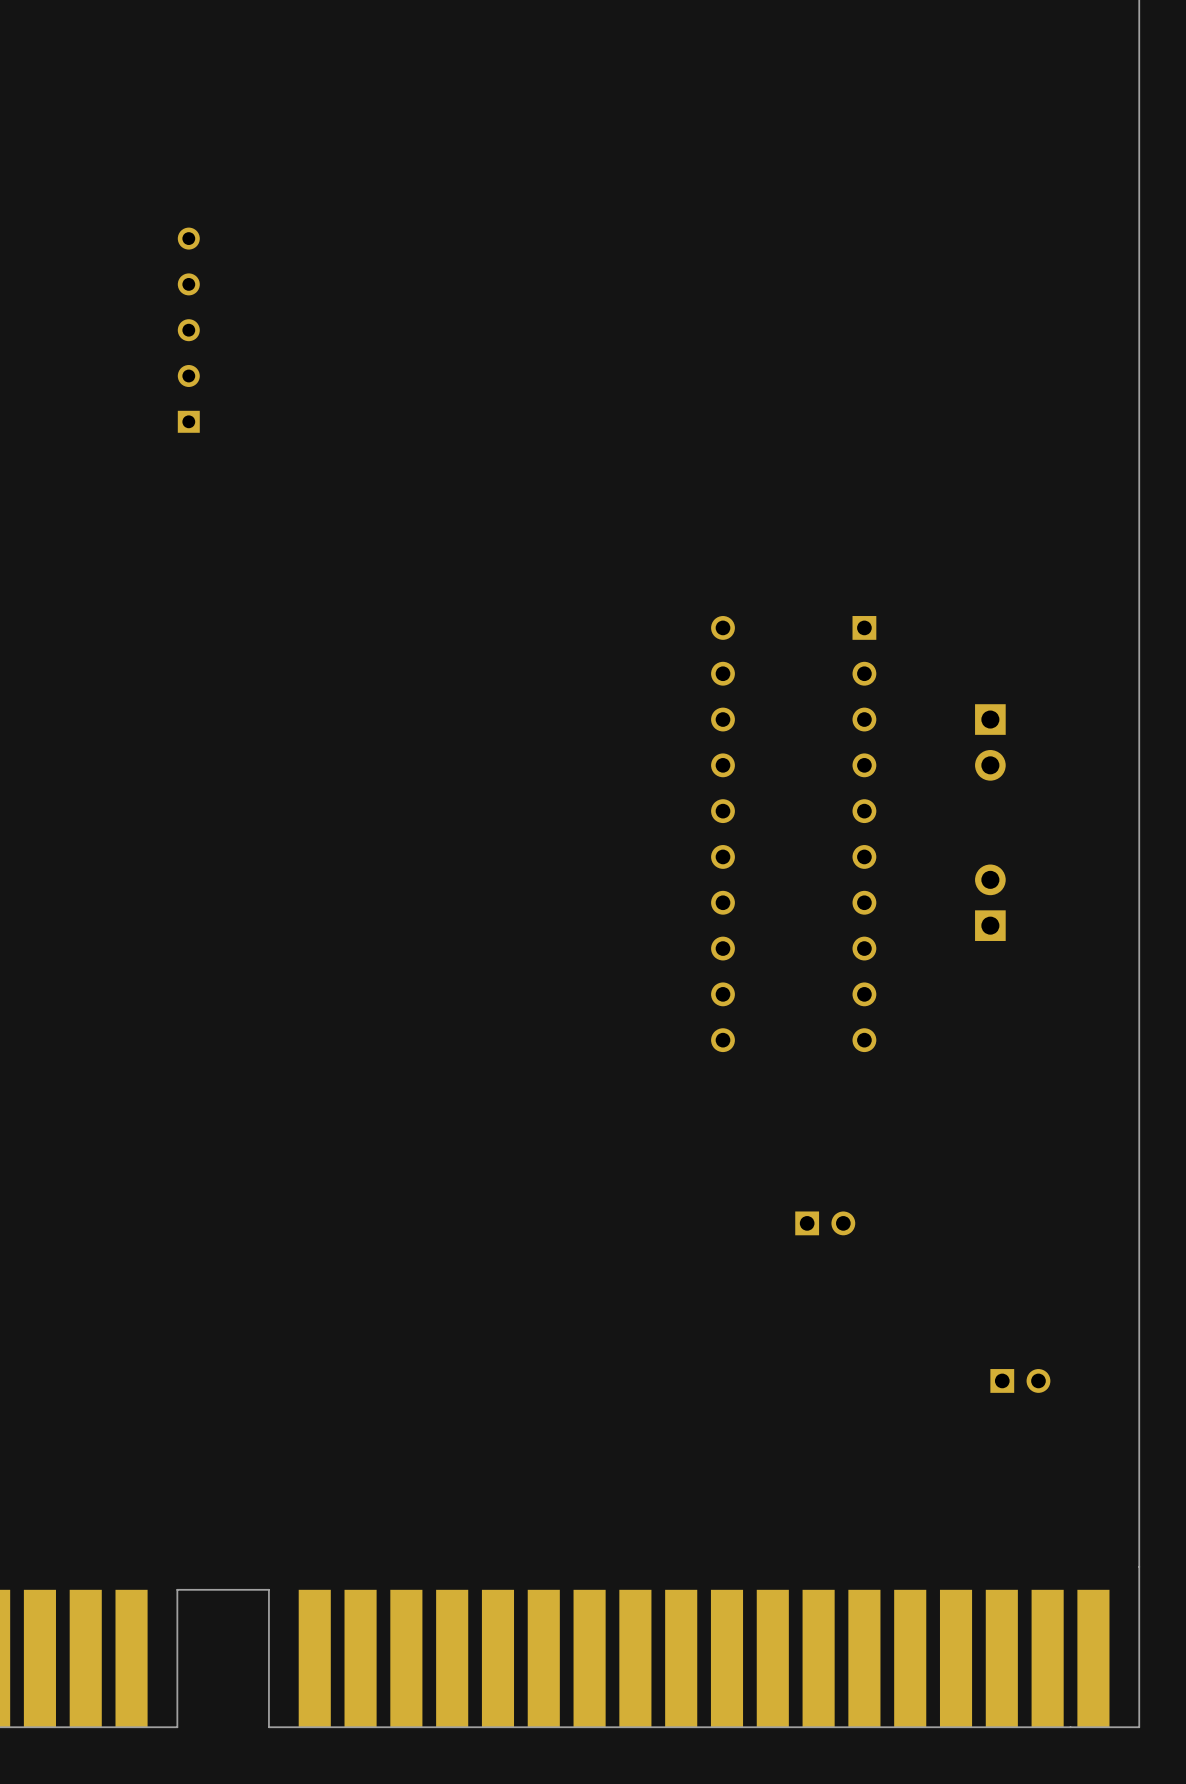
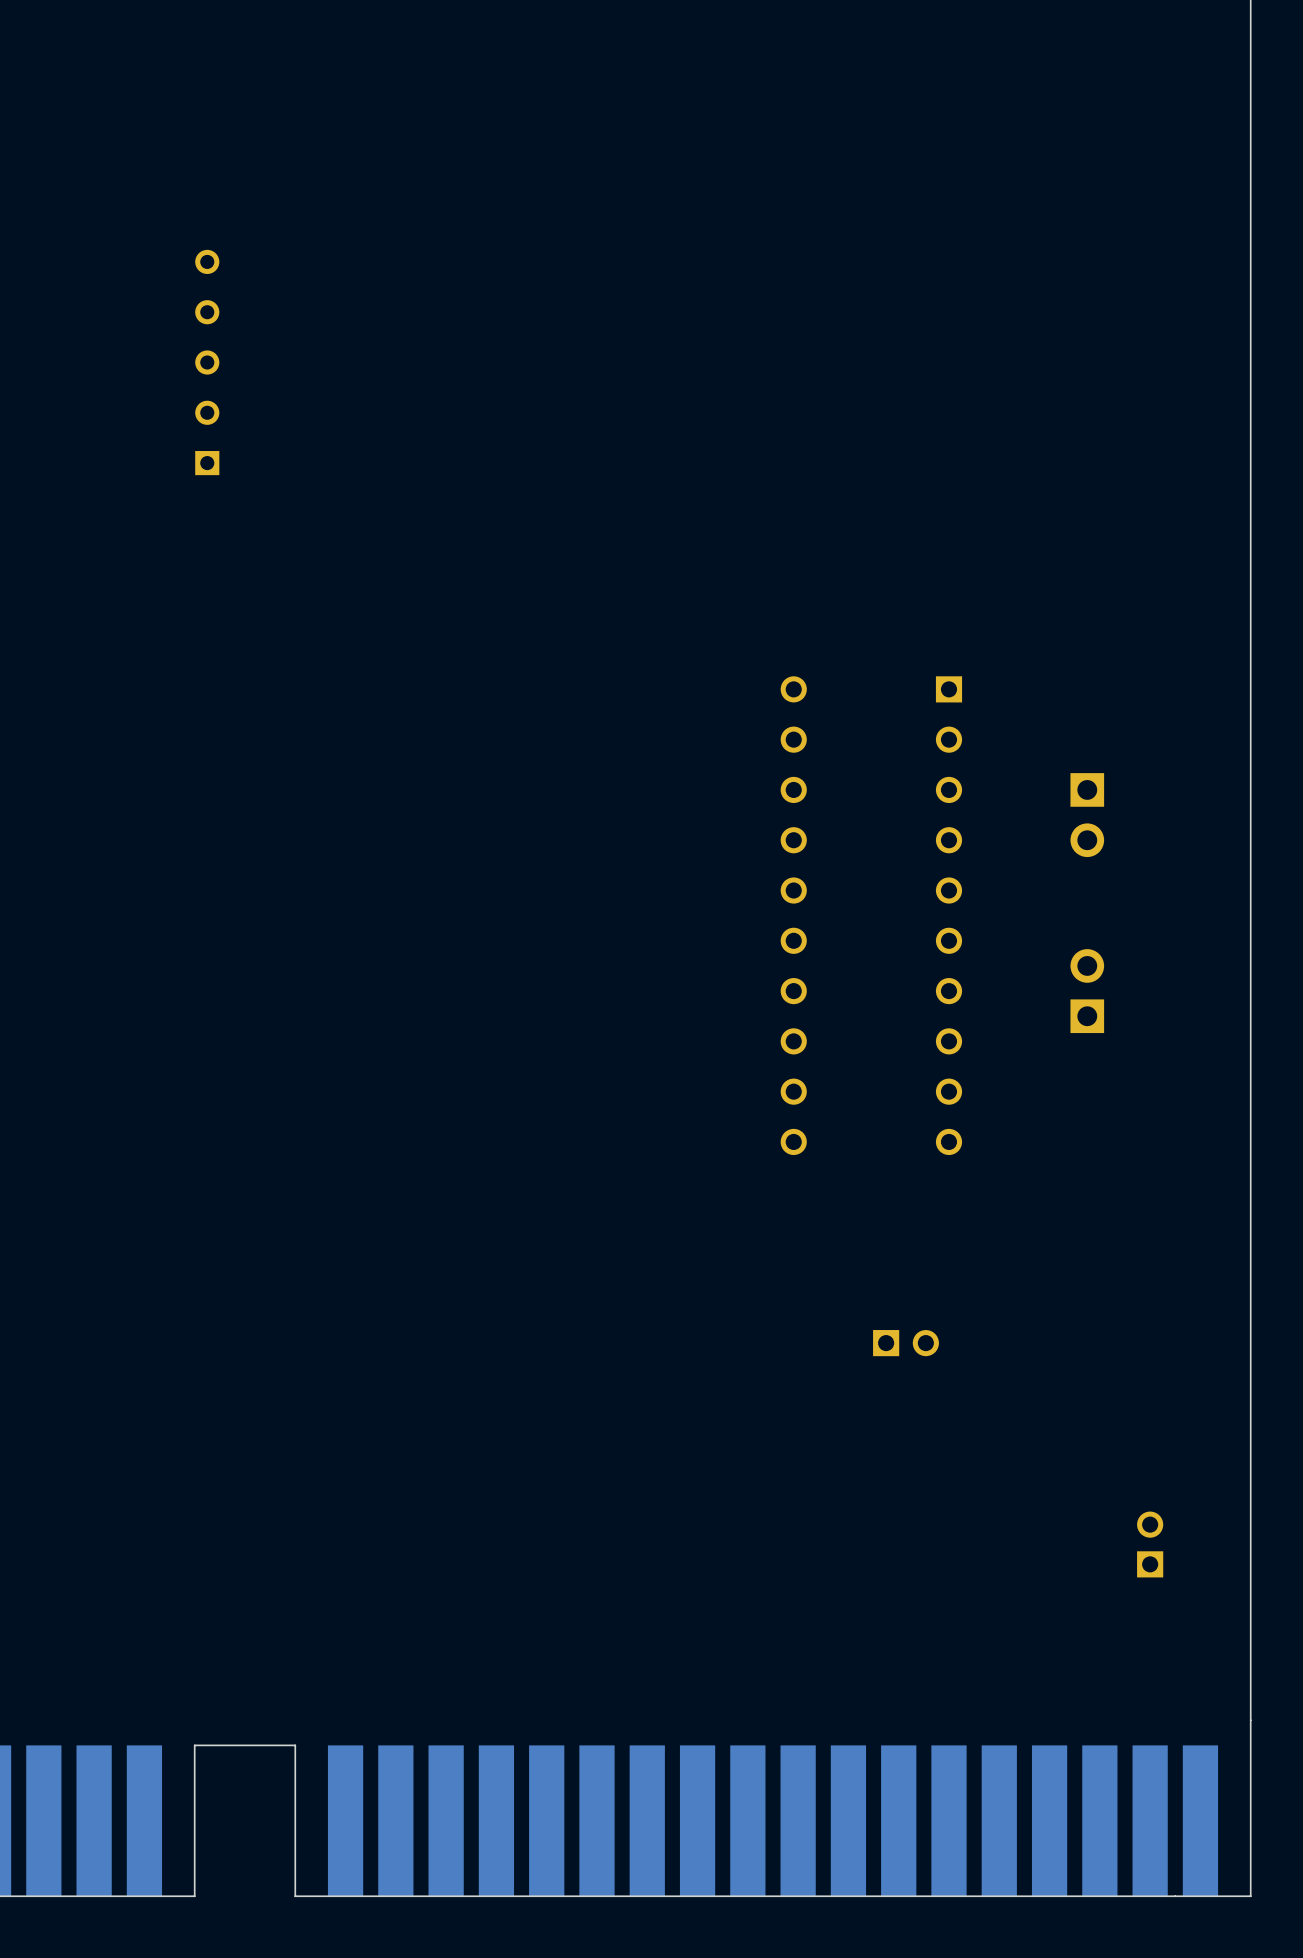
part rotation: 0° (1020, 1380) -> 90° counterclockwise (1150, 1544)
part position: (1020, 1380) -> (1150, 1544)

